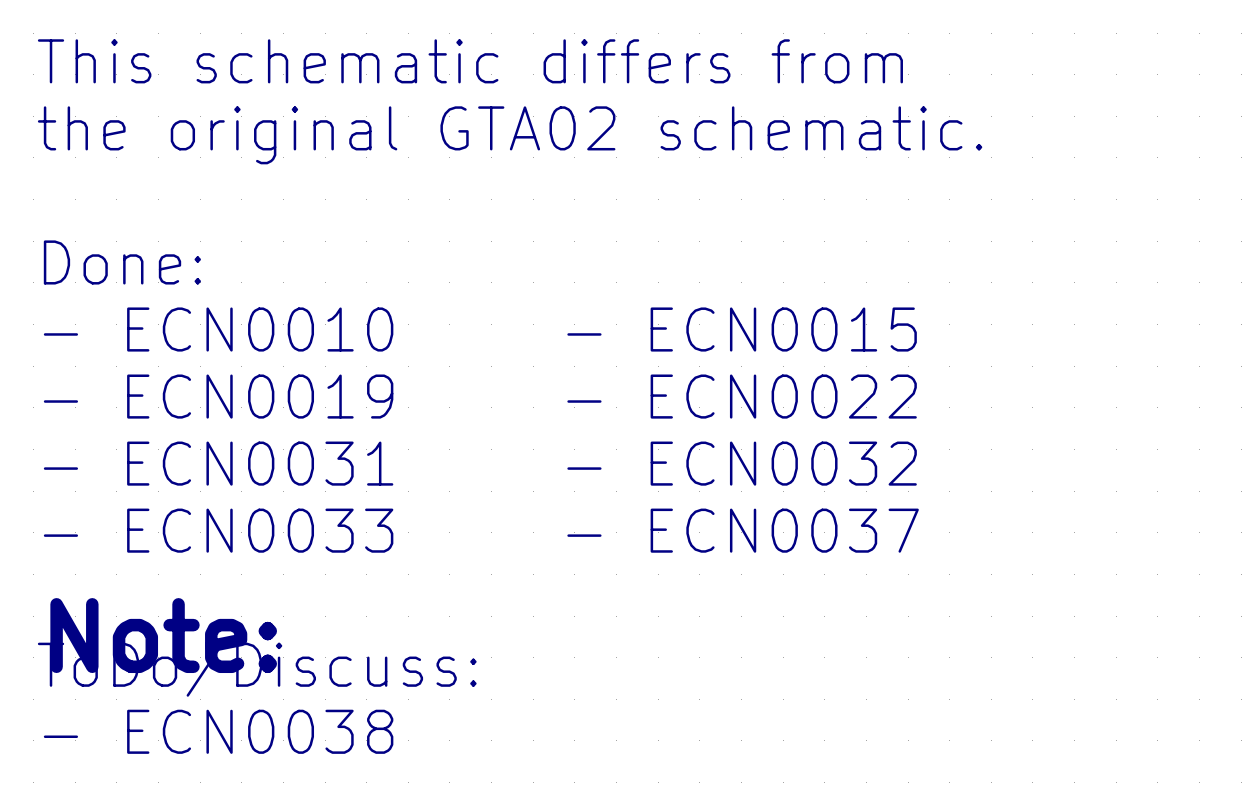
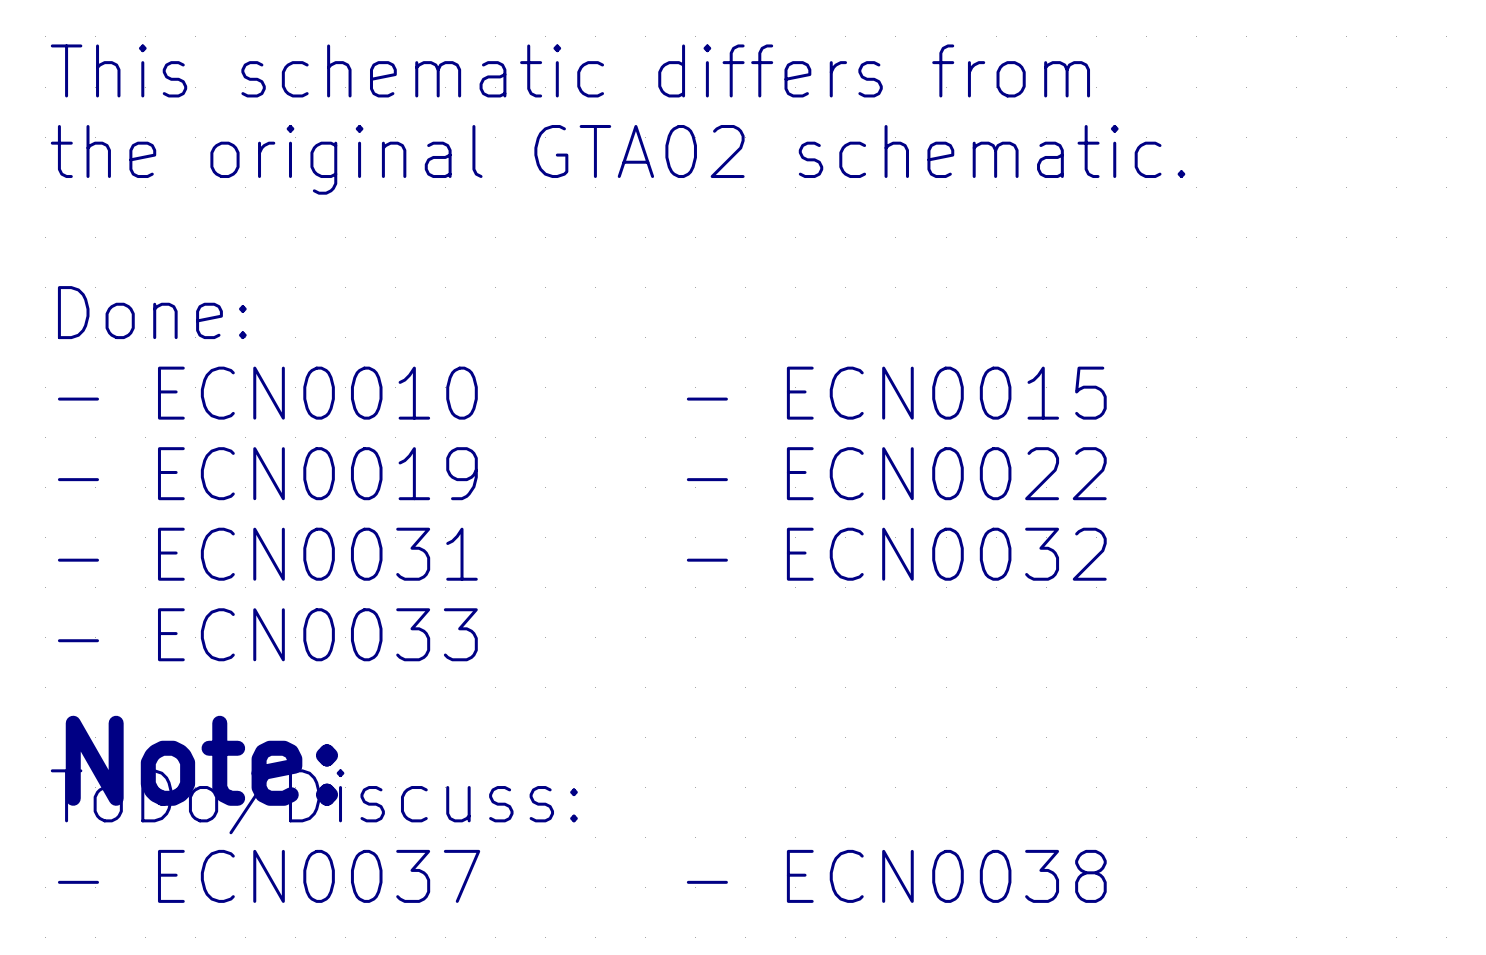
text: - ECN0033 - ECN0037 (481, 530) -> - ECN0033 (267, 634)
text: - ECN0038 (218, 731) -> - ECN0037 - ECN0038 (582, 876)

